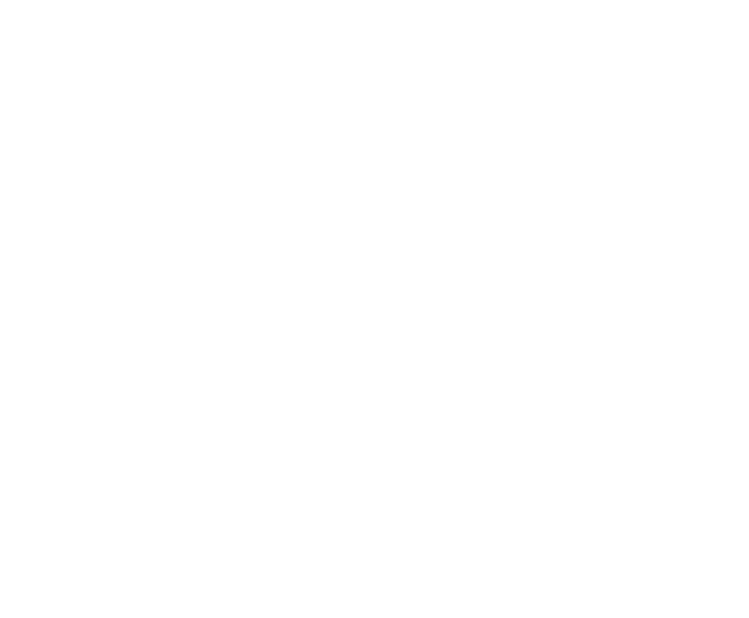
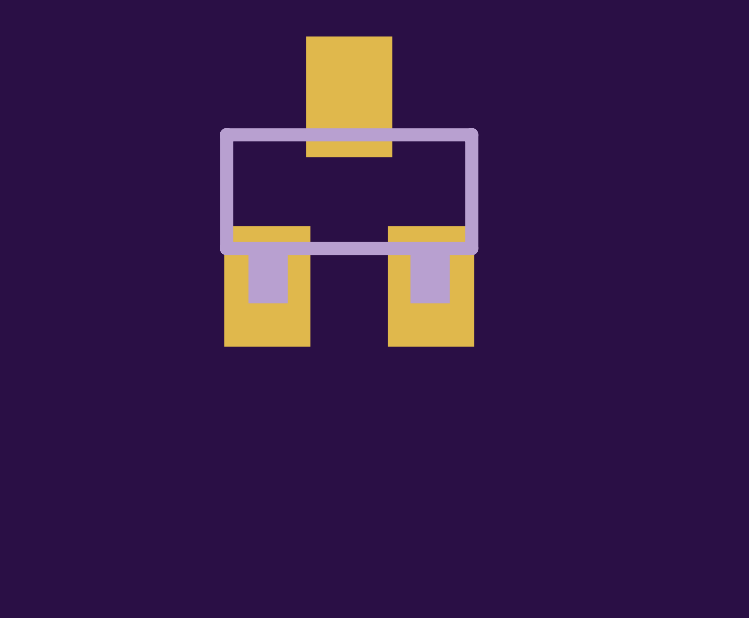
part: none -> (349, 191)

